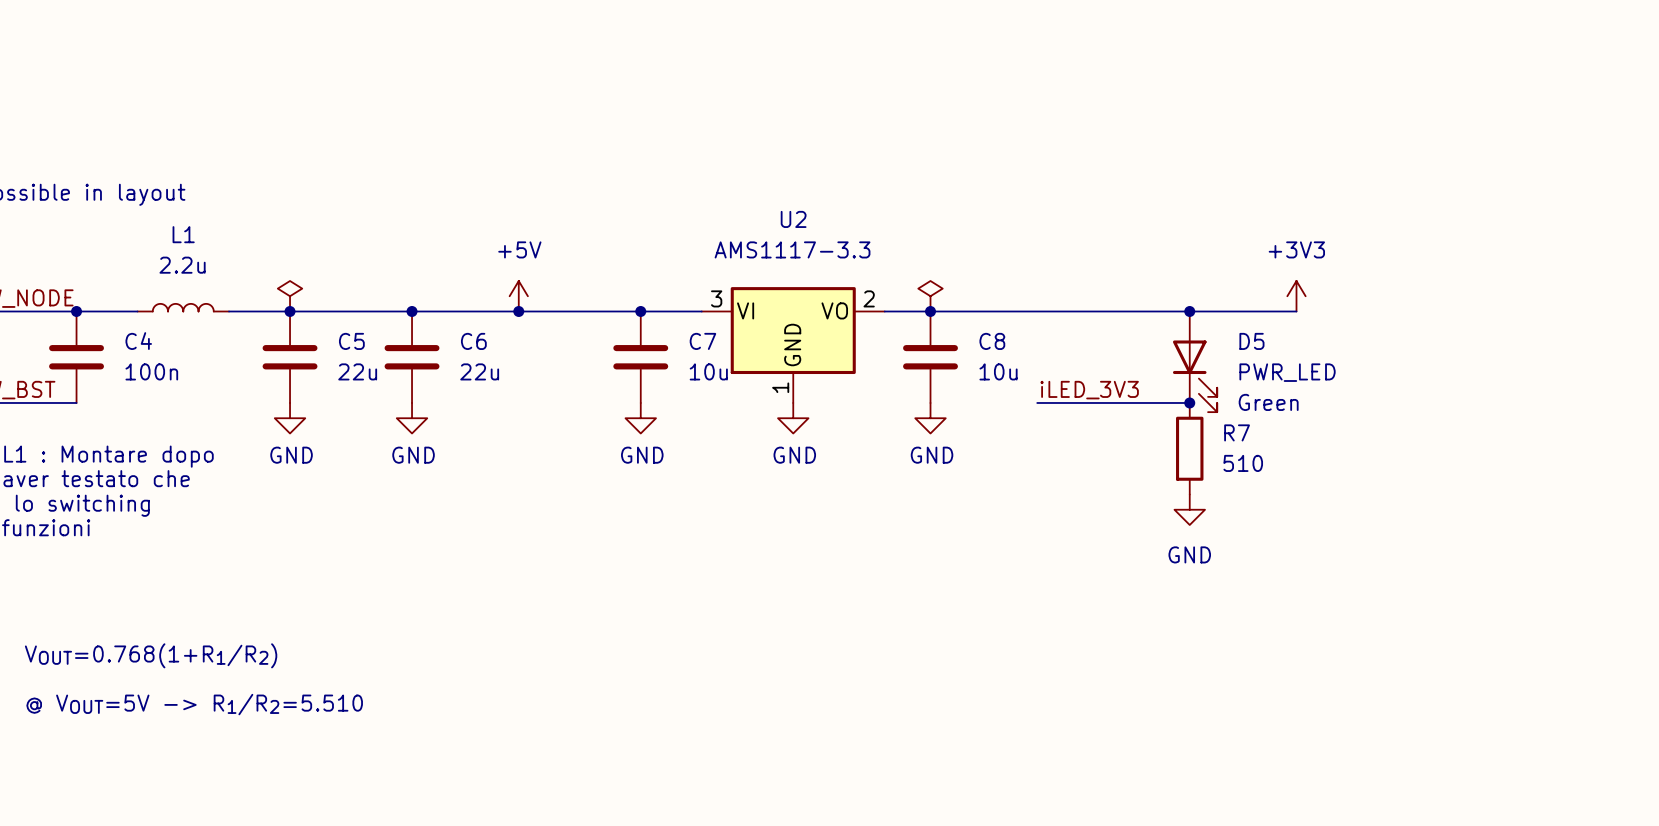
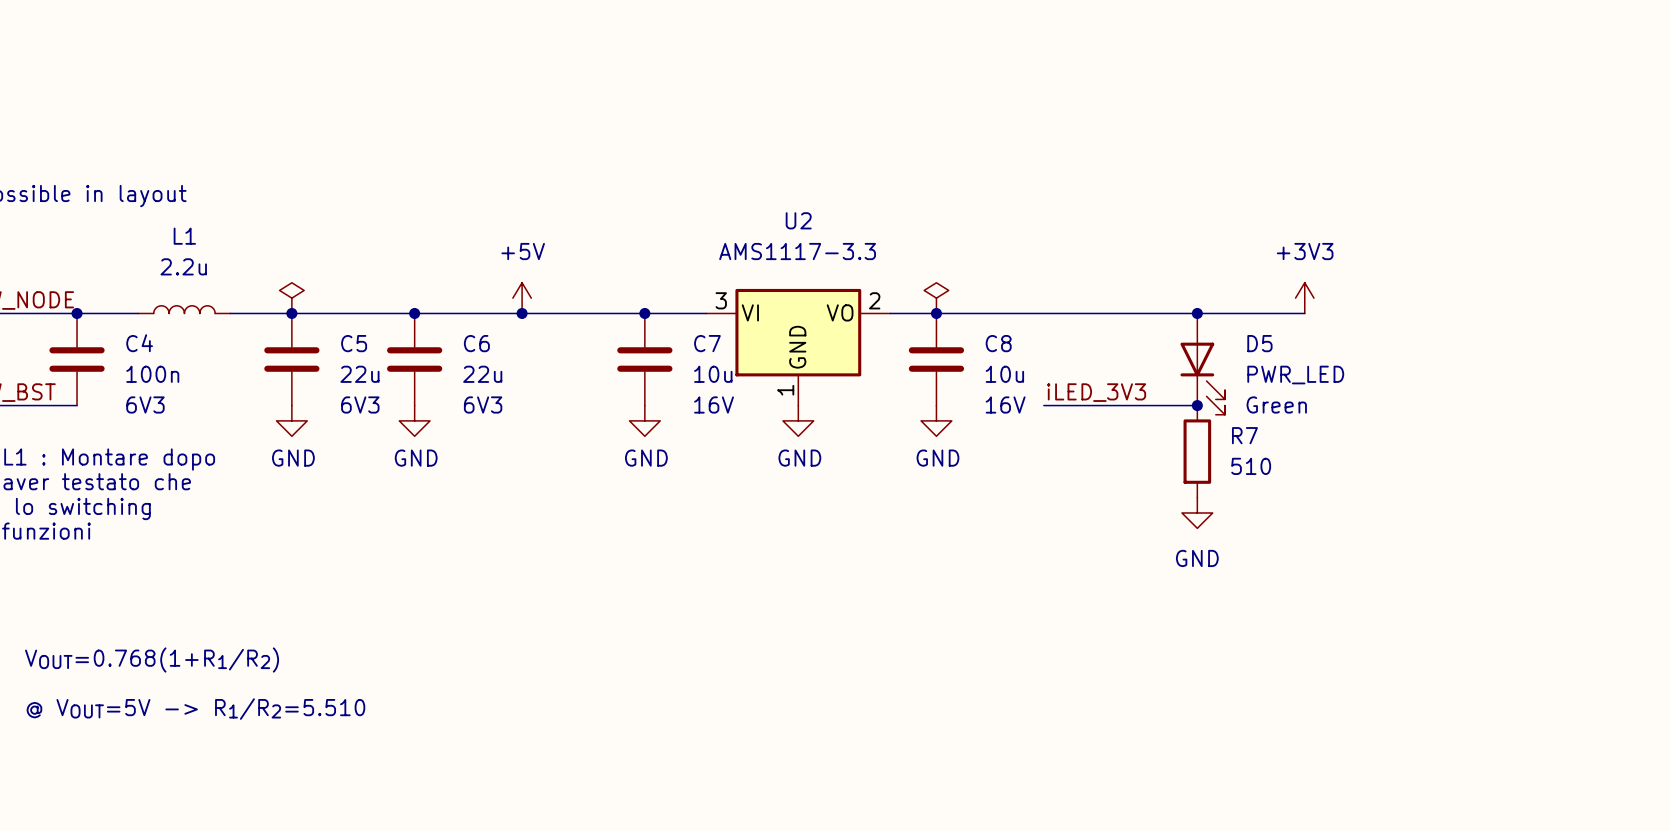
C4 text: none -> 6V3 (145, 404)
C5 text: none -> 6V3 (360, 404)
C6 text: none -> 6V3 (483, 404)
C7 text: none -> 16V (714, 404)
C8 text: none -> 16V (1005, 404)

